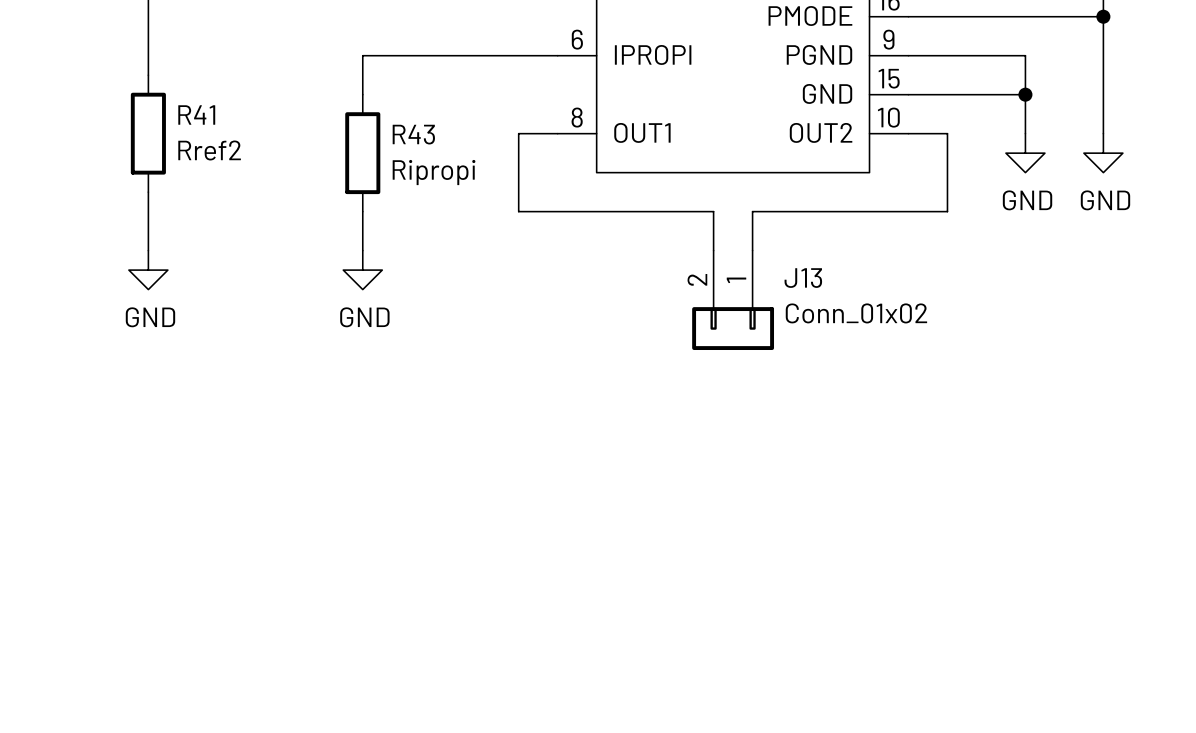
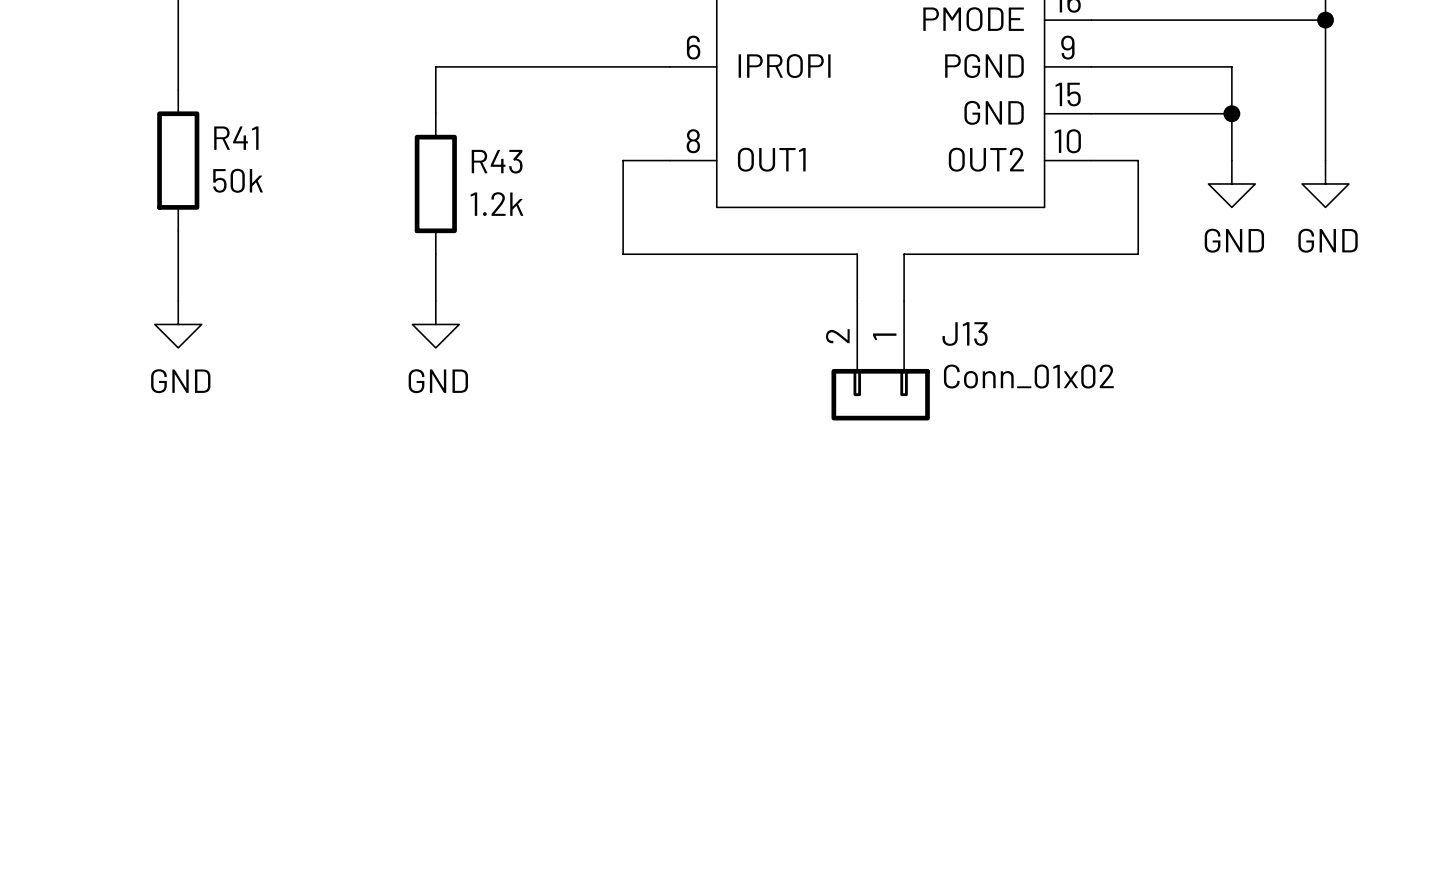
R41 value: Rref2 (209, 150) -> 50k (238, 180)
R43 value: Ripropi (434, 172) -> 1.2k (496, 204)

